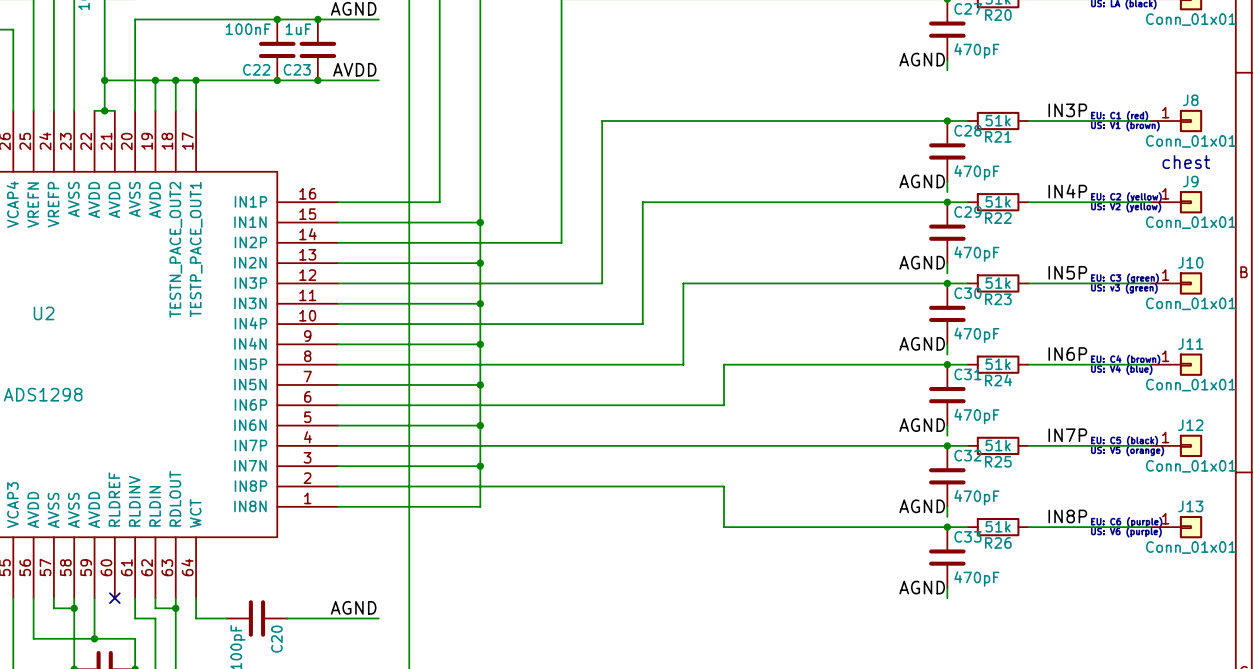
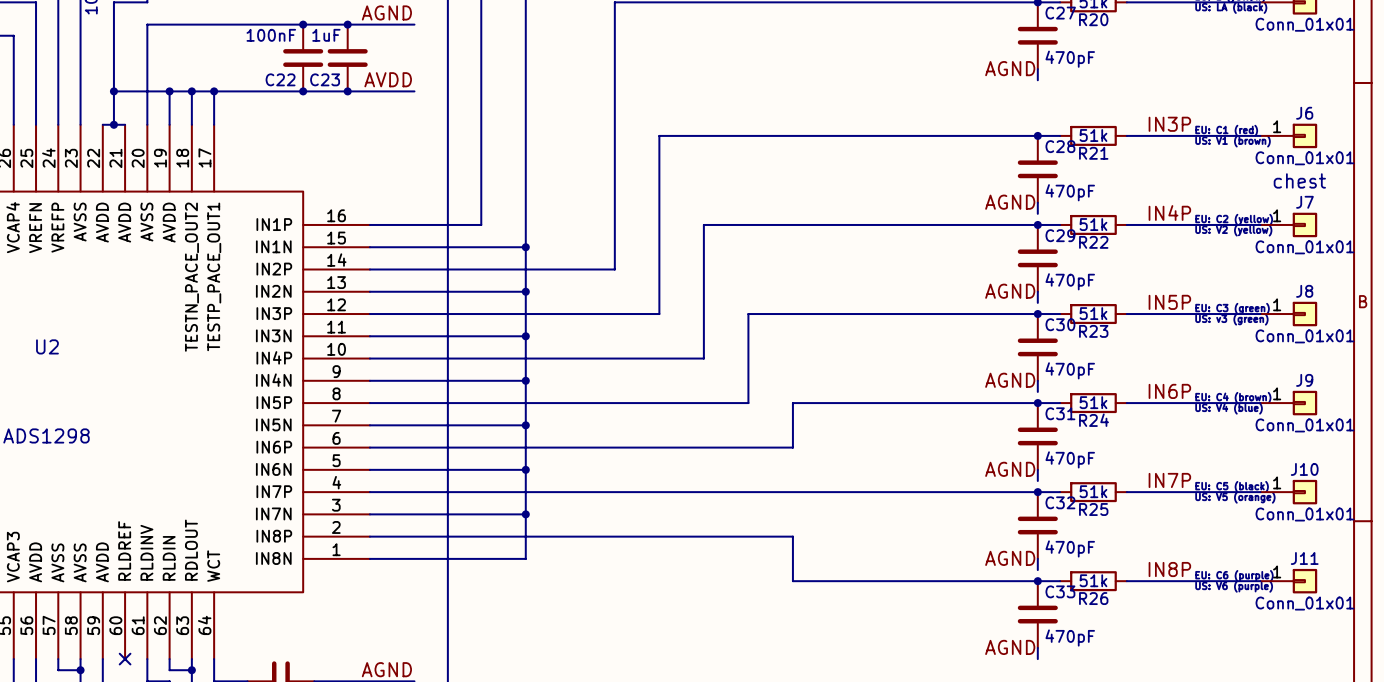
J8 name: J8 (1190, 100) -> J6 (1304, 113)
J9 name: J9 (1190, 181) -> J7 (1304, 202)
J10 name: J10 (1190, 262) -> J8 (1304, 291)
J11 name: J11 (1190, 343) -> J9 (1304, 380)
J12 name: J12 (1190, 425) -> J10 (1304, 469)
J13 name: J13 (1190, 506) -> J11 (1304, 558)

